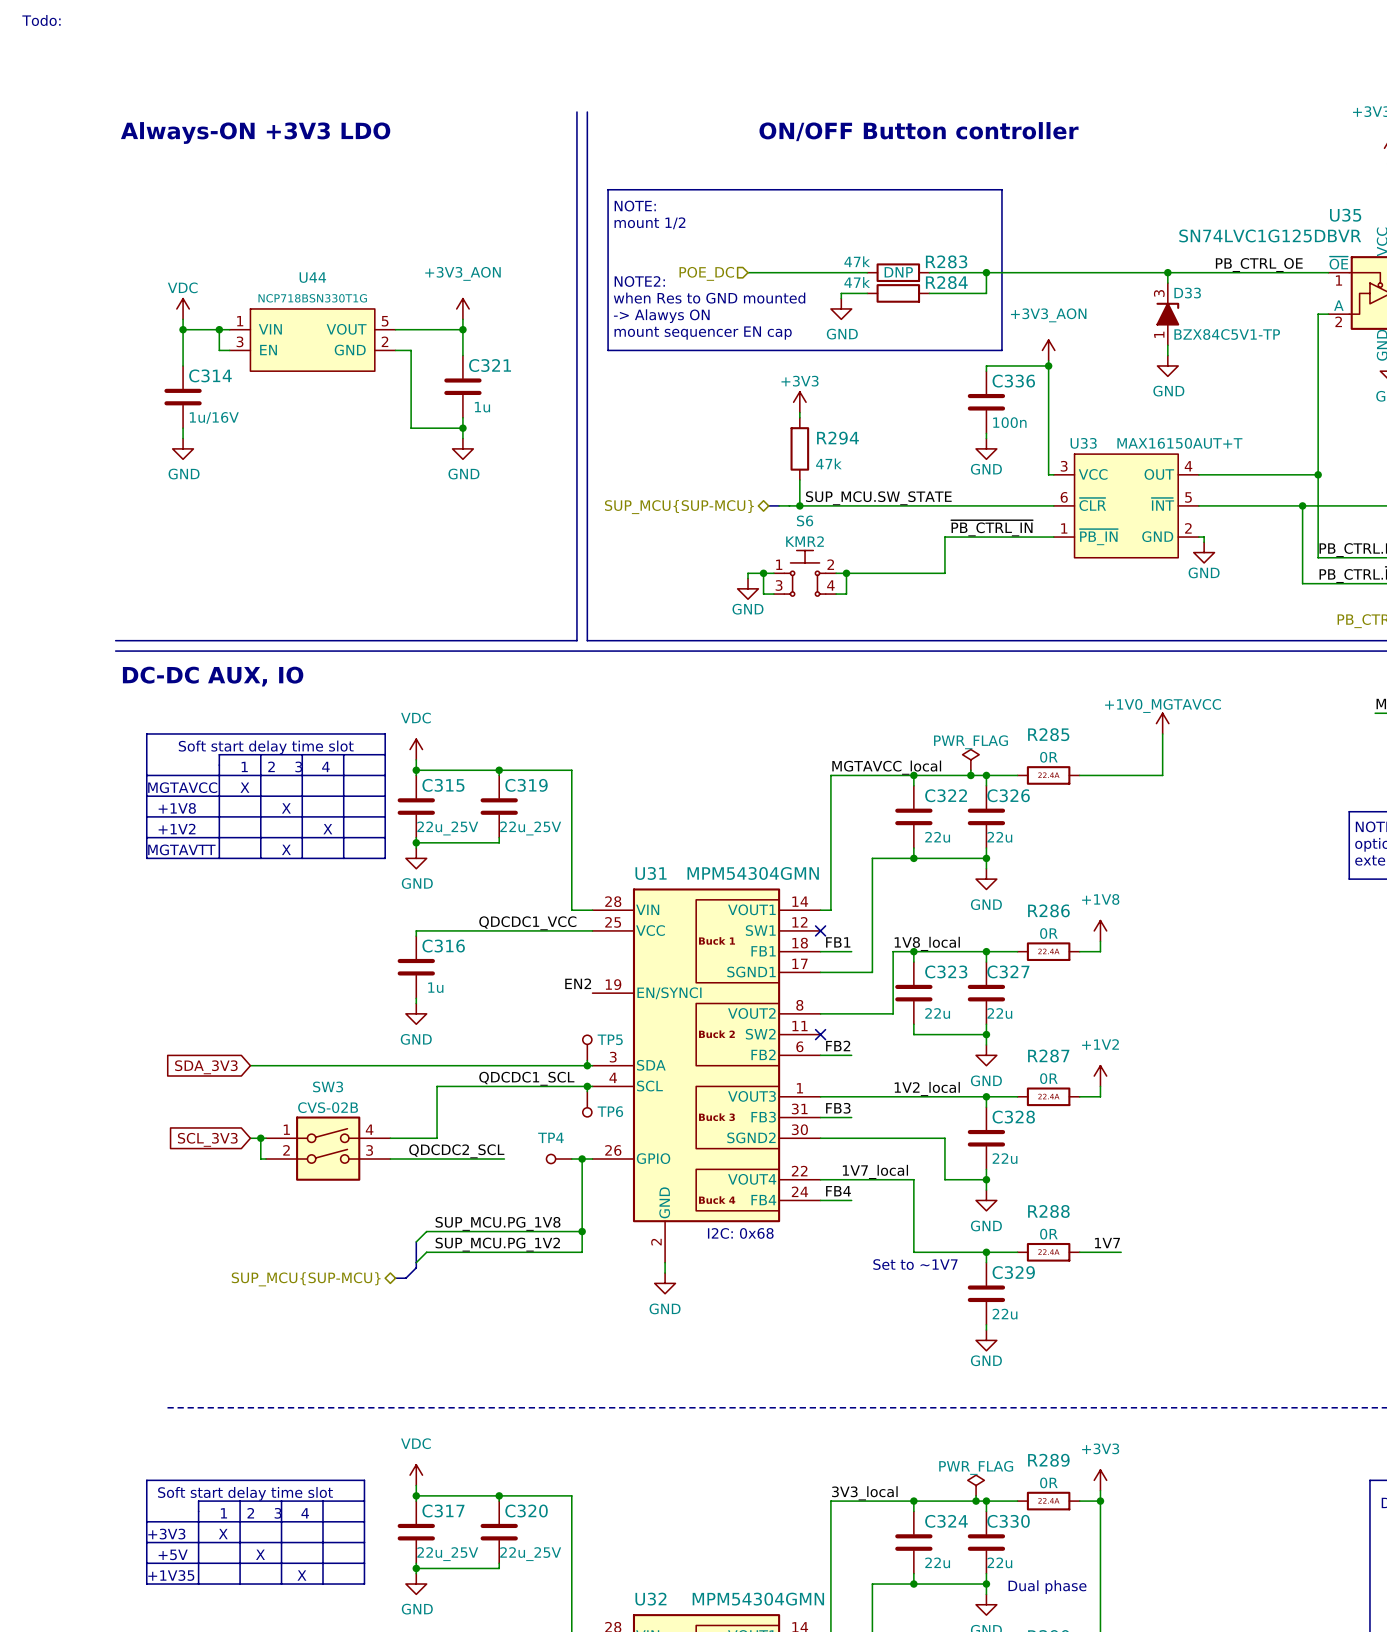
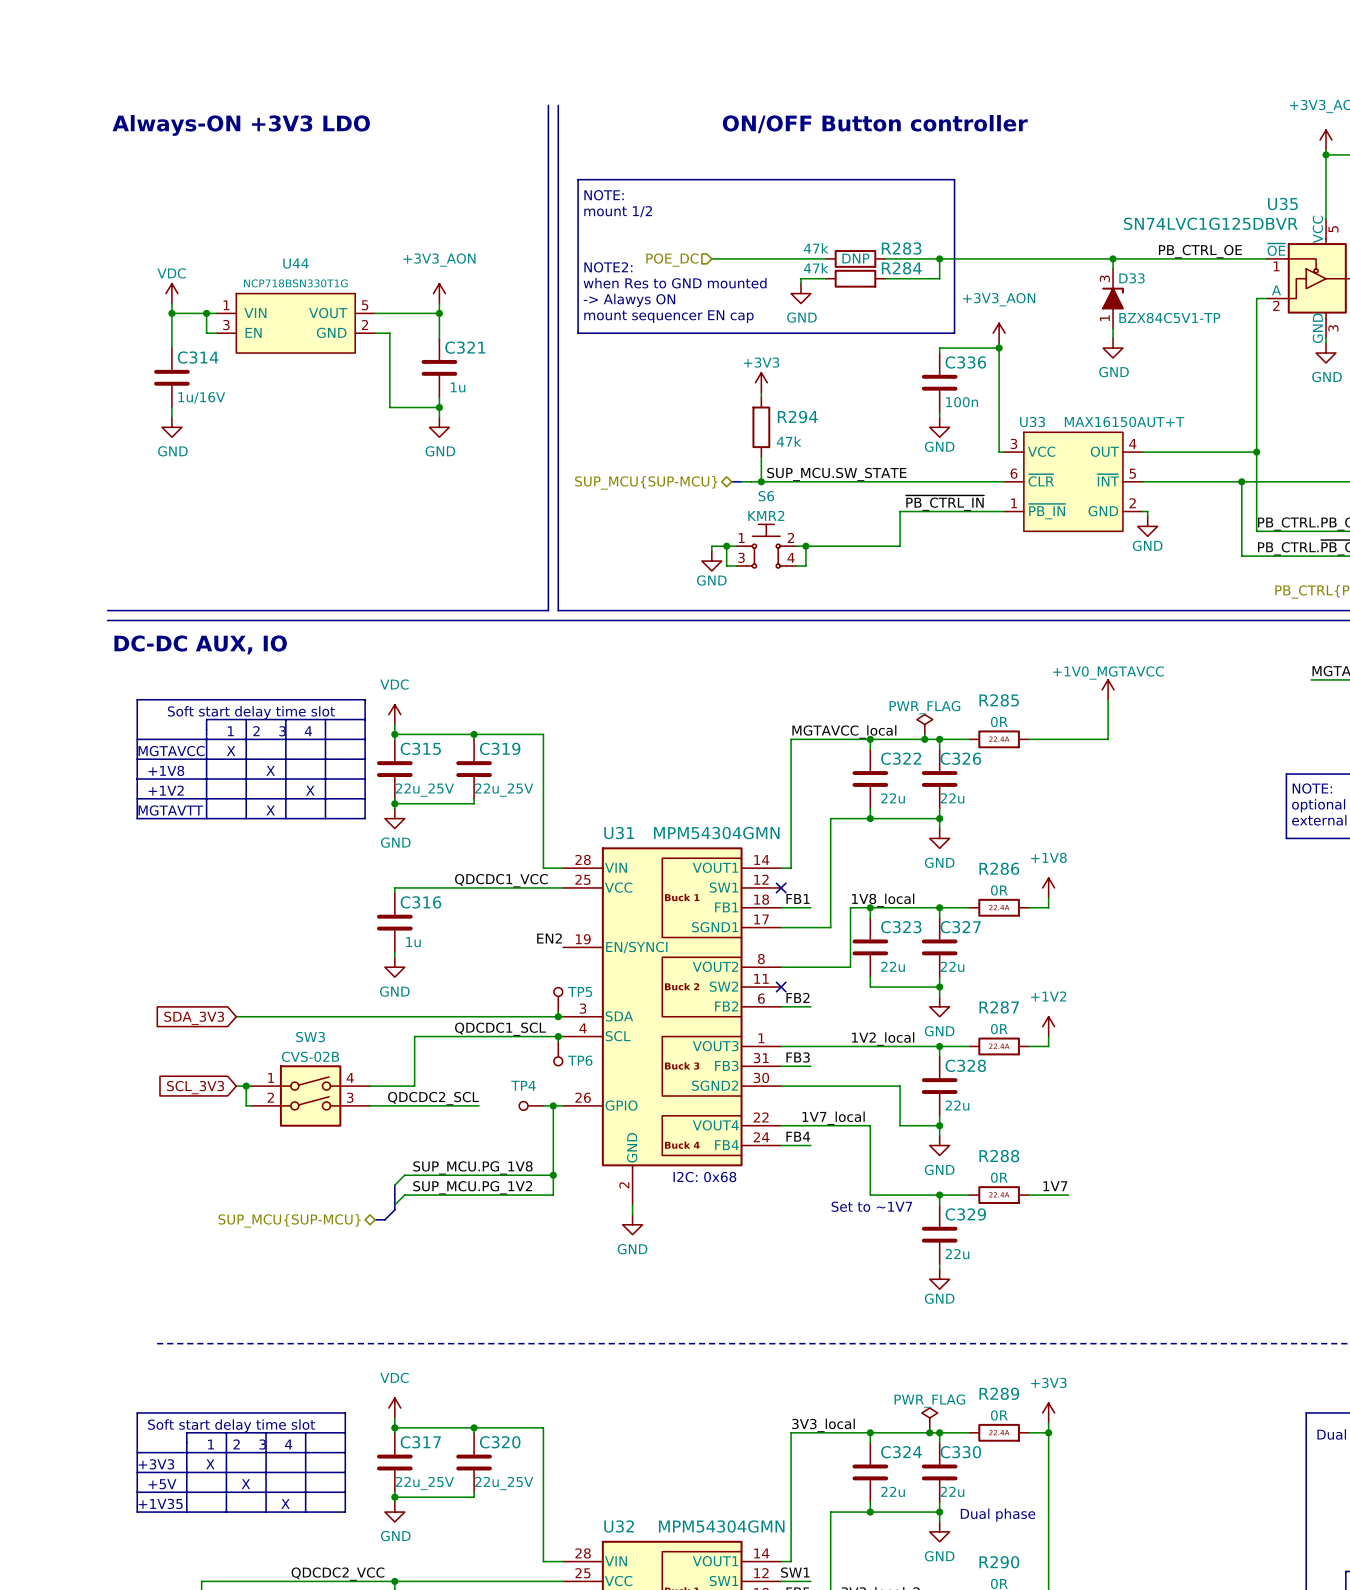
text: Todo: (41, 20) -> none

